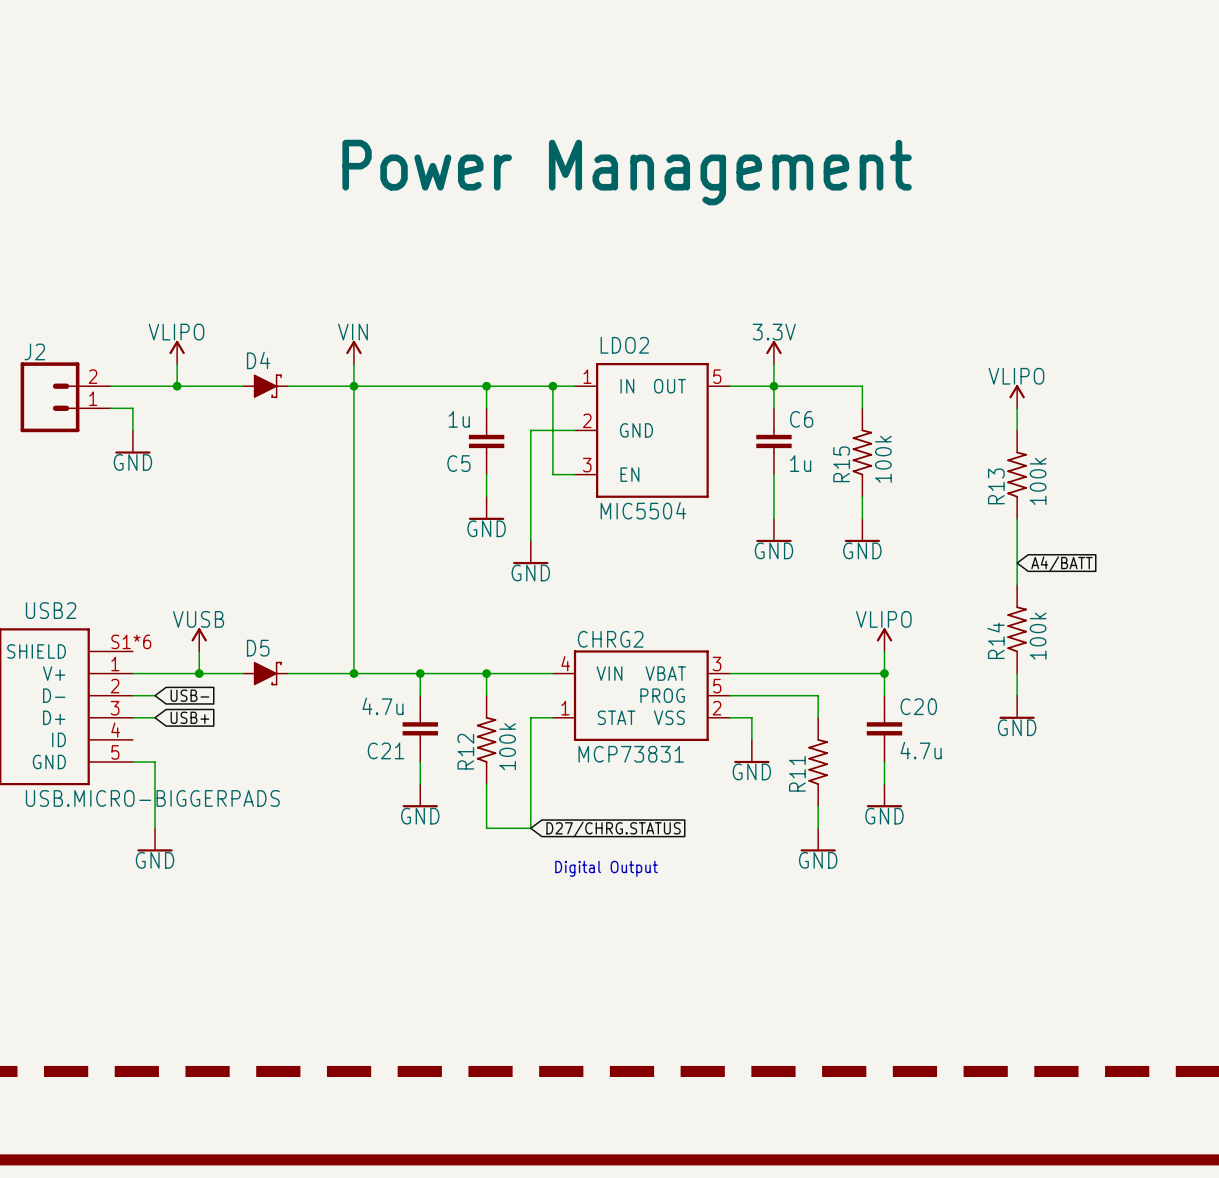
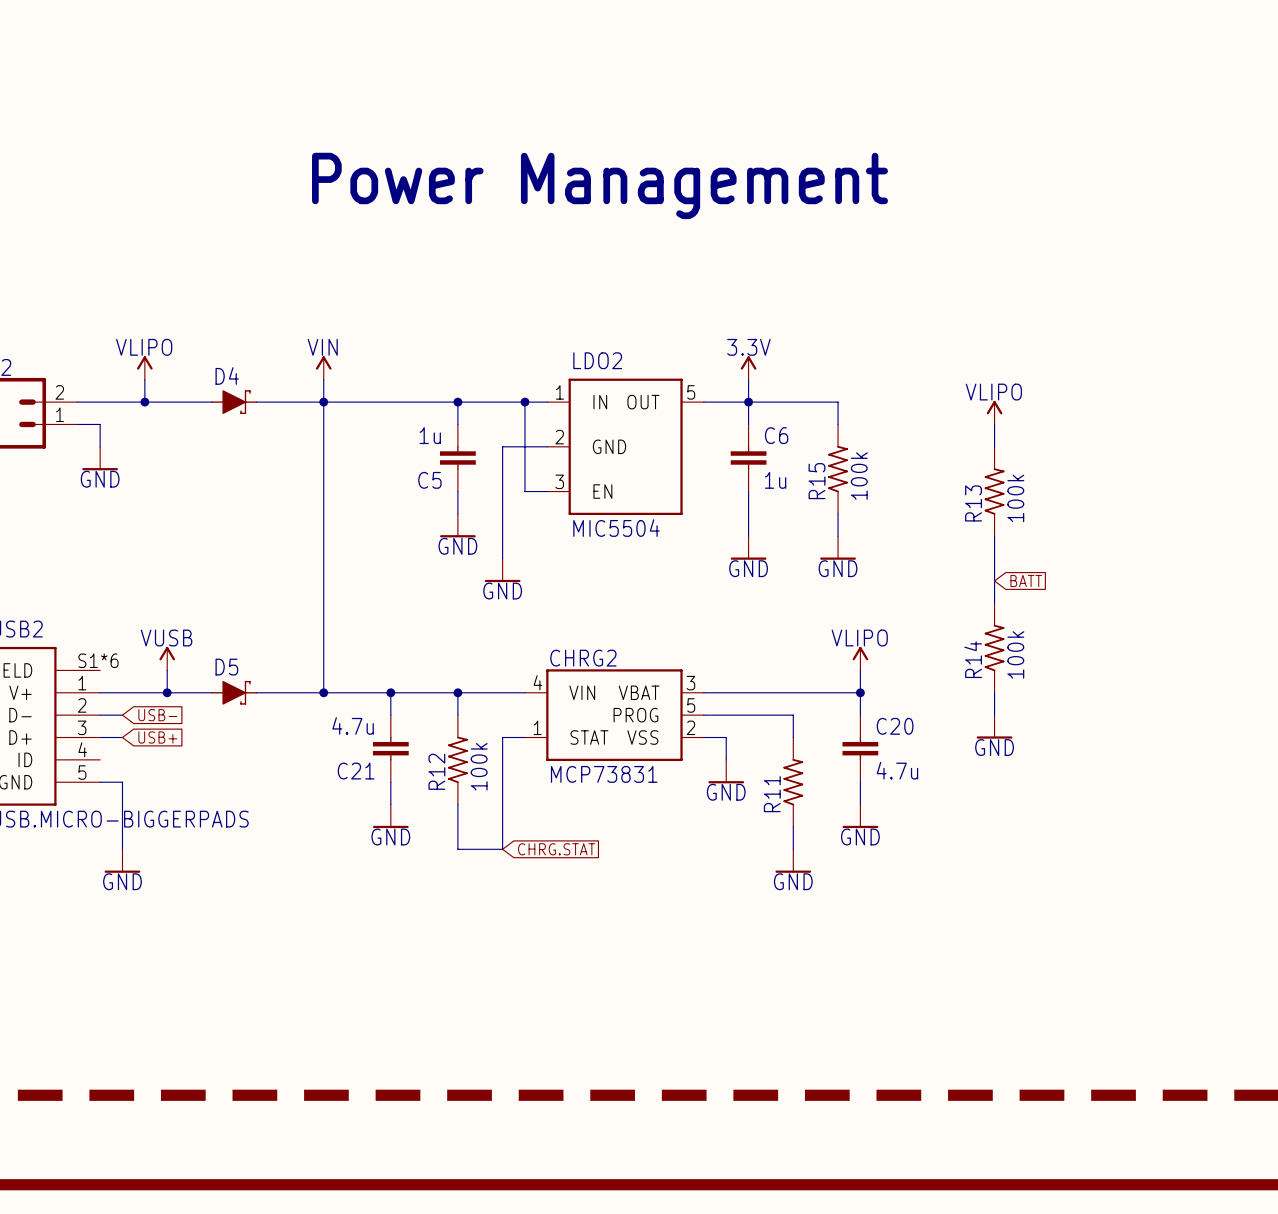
global label: A4/BATT (1061, 564) -> BATT (1026, 580)
global label: D27/CHRG.STATUS (613, 829) -> CHRG.STAT (556, 849)
text: Digital Output (606, 868) -> none

